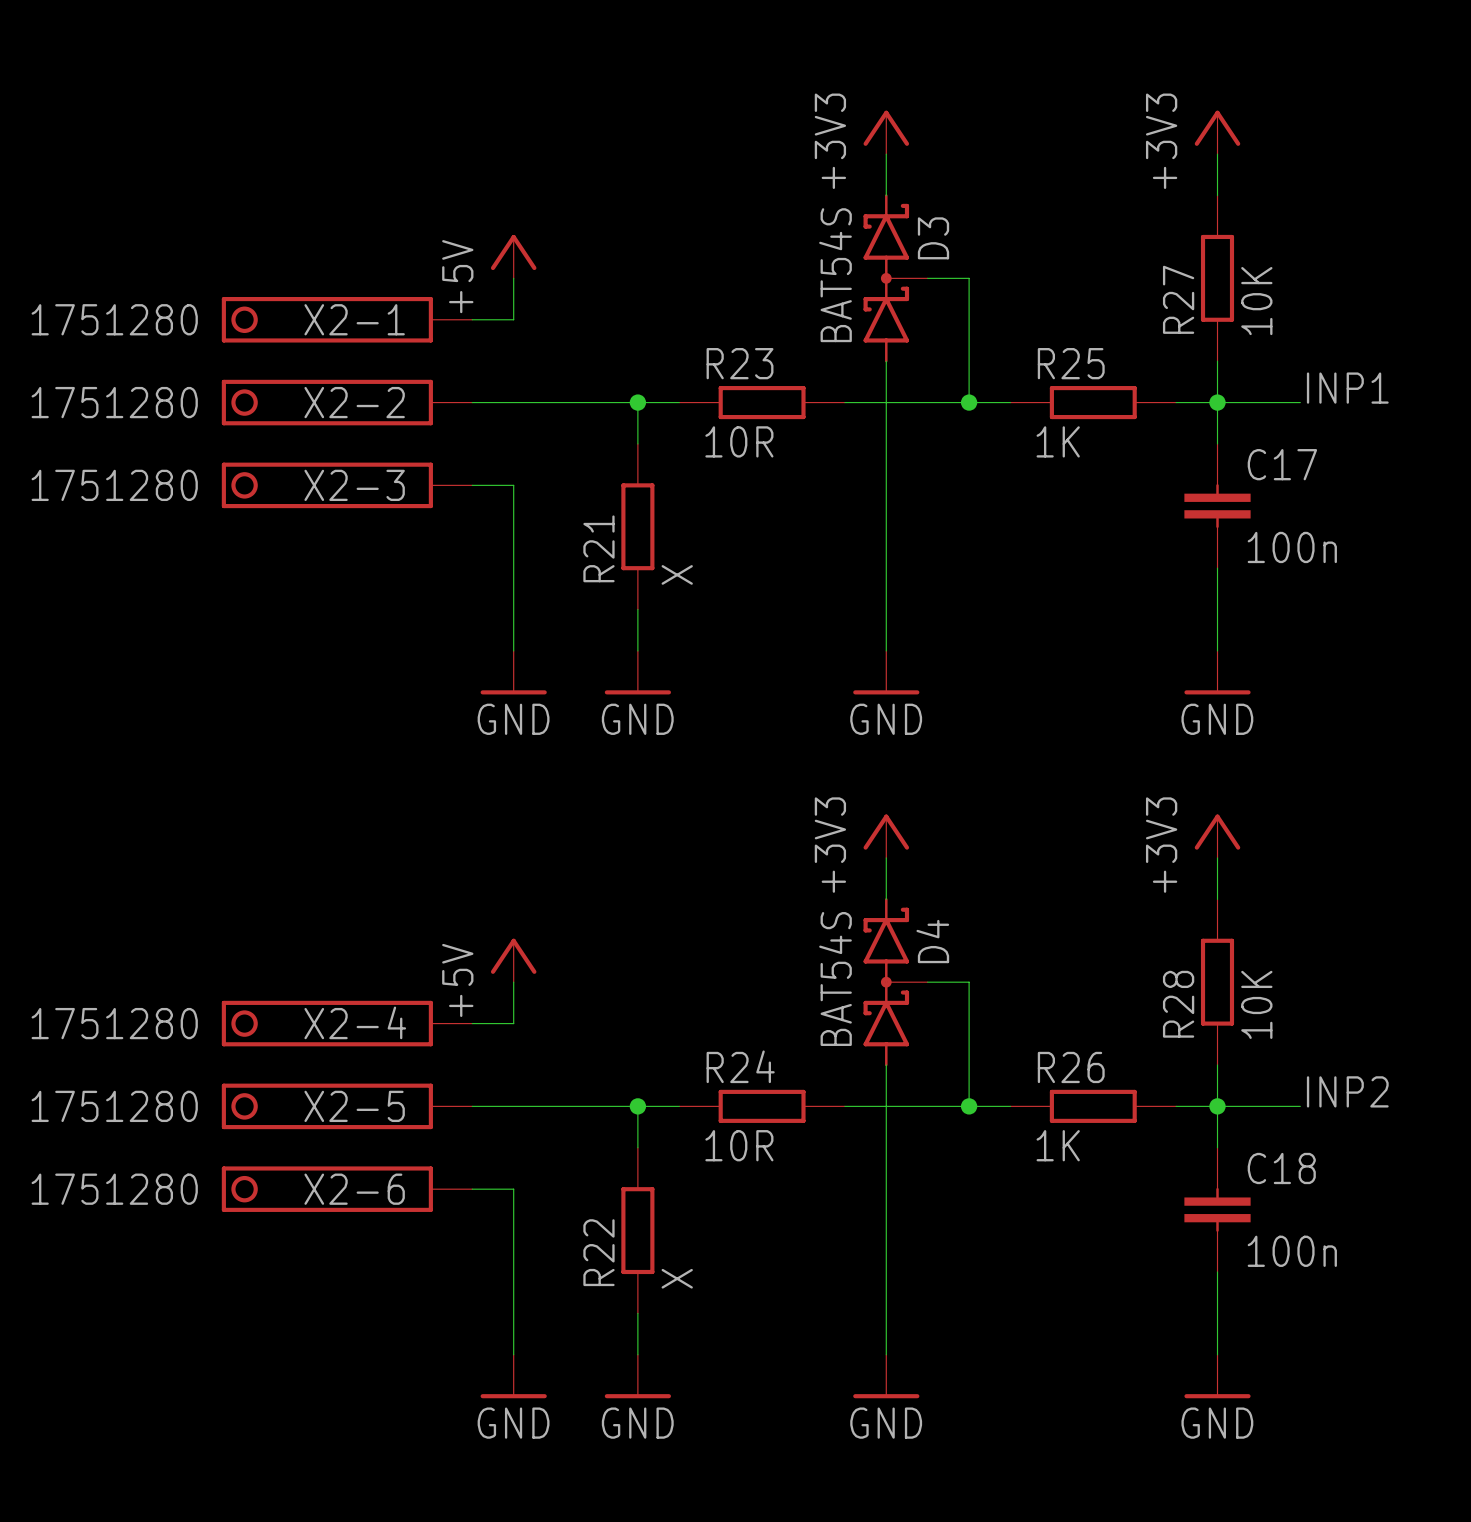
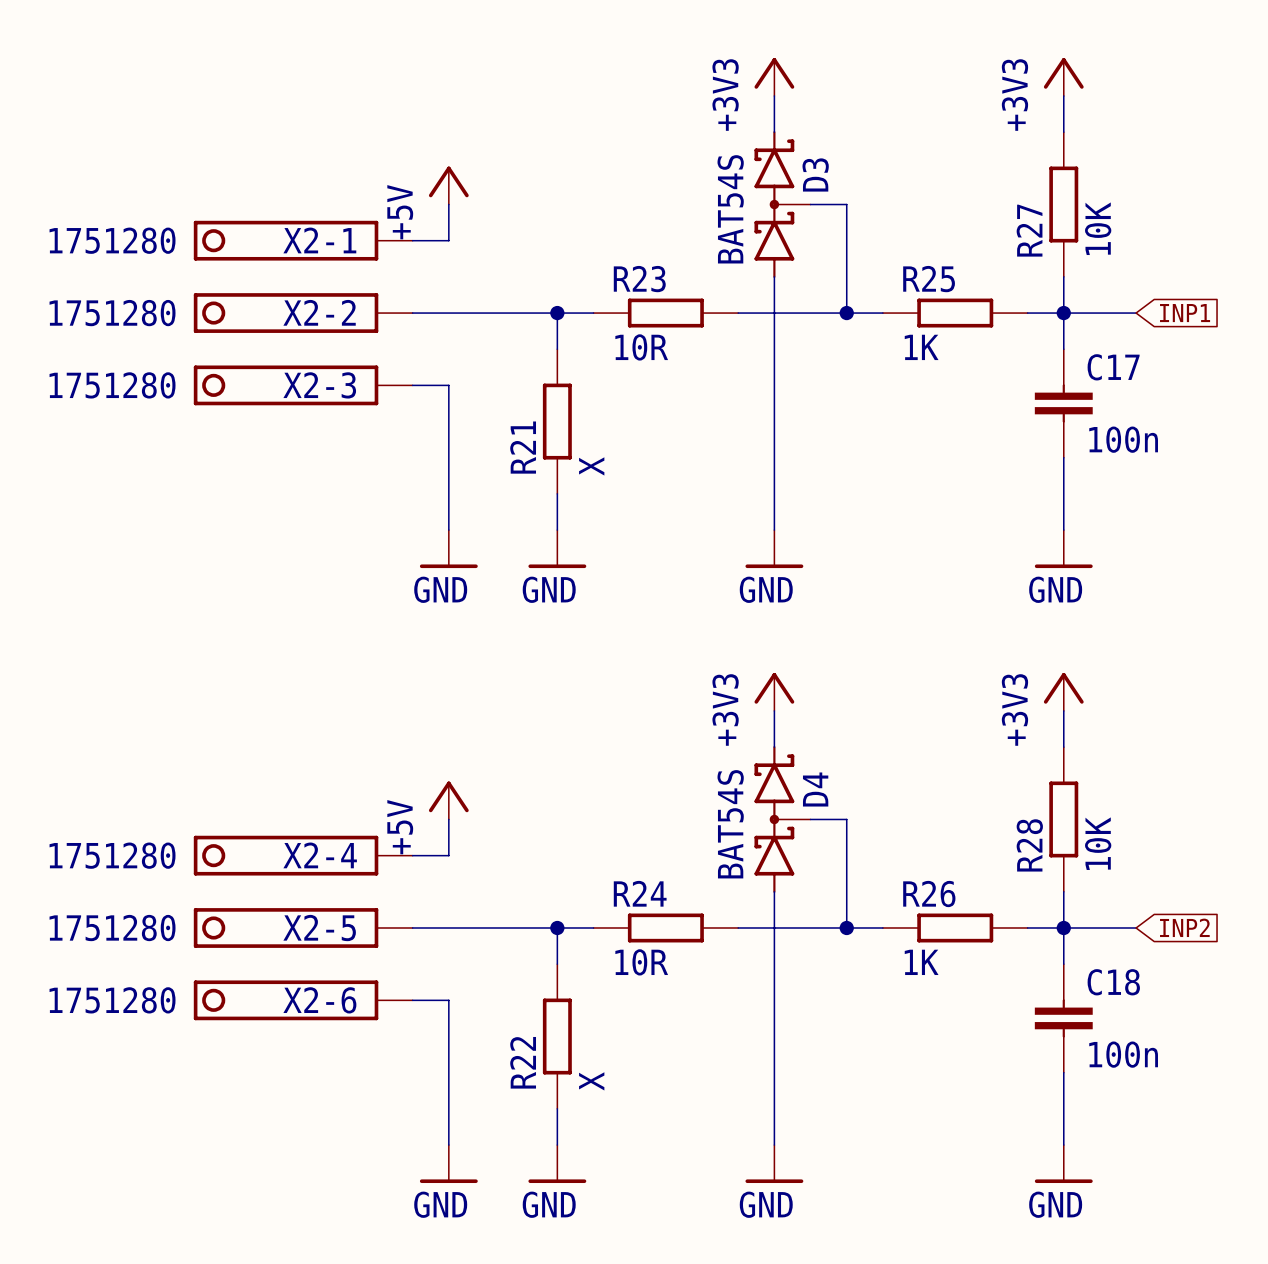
label: INP1 (1347, 388) -> none
global label: none -> INP1 (1185, 313)
label: INP2 (1347, 1091) -> none
global label: none -> INP2 (1184, 927)

